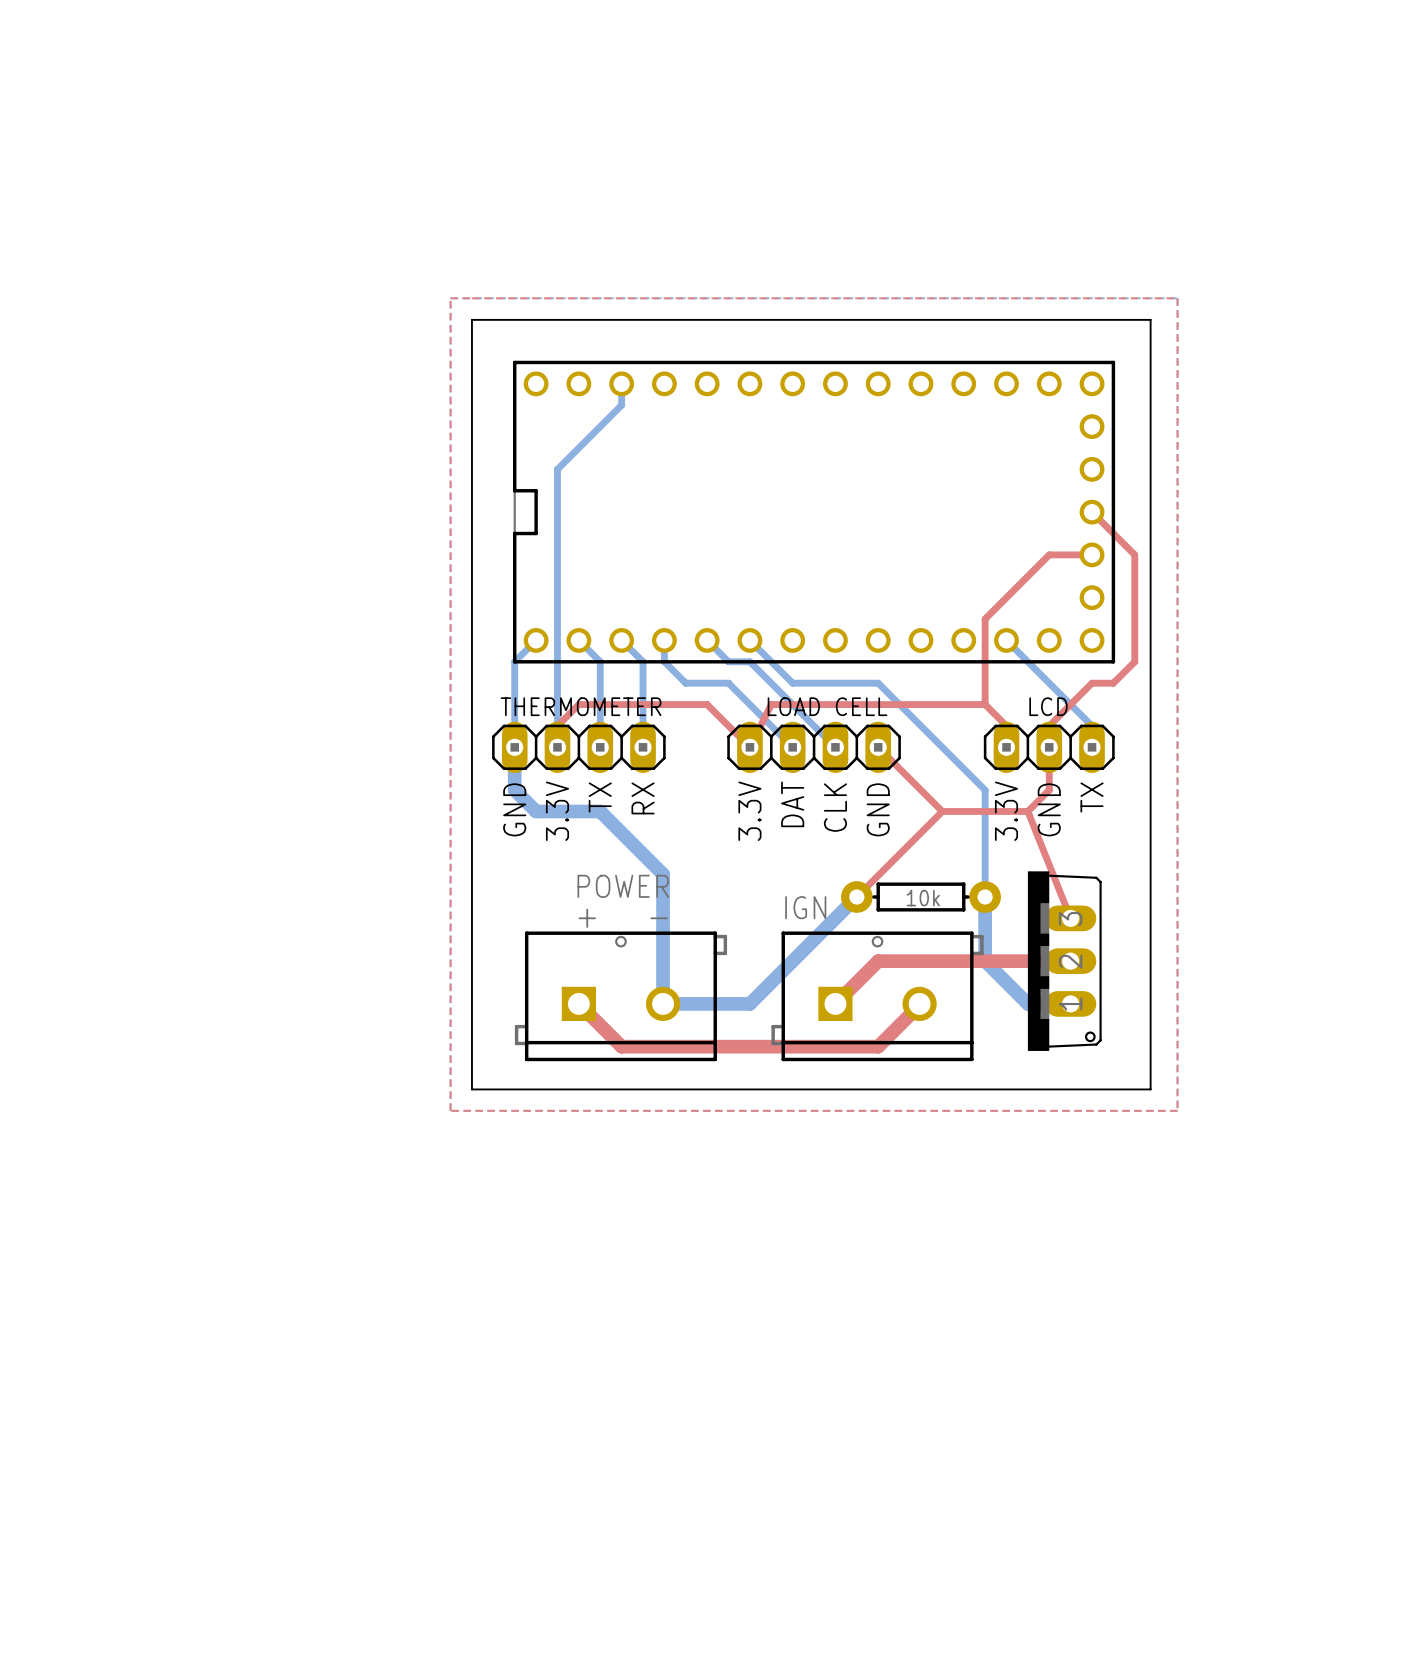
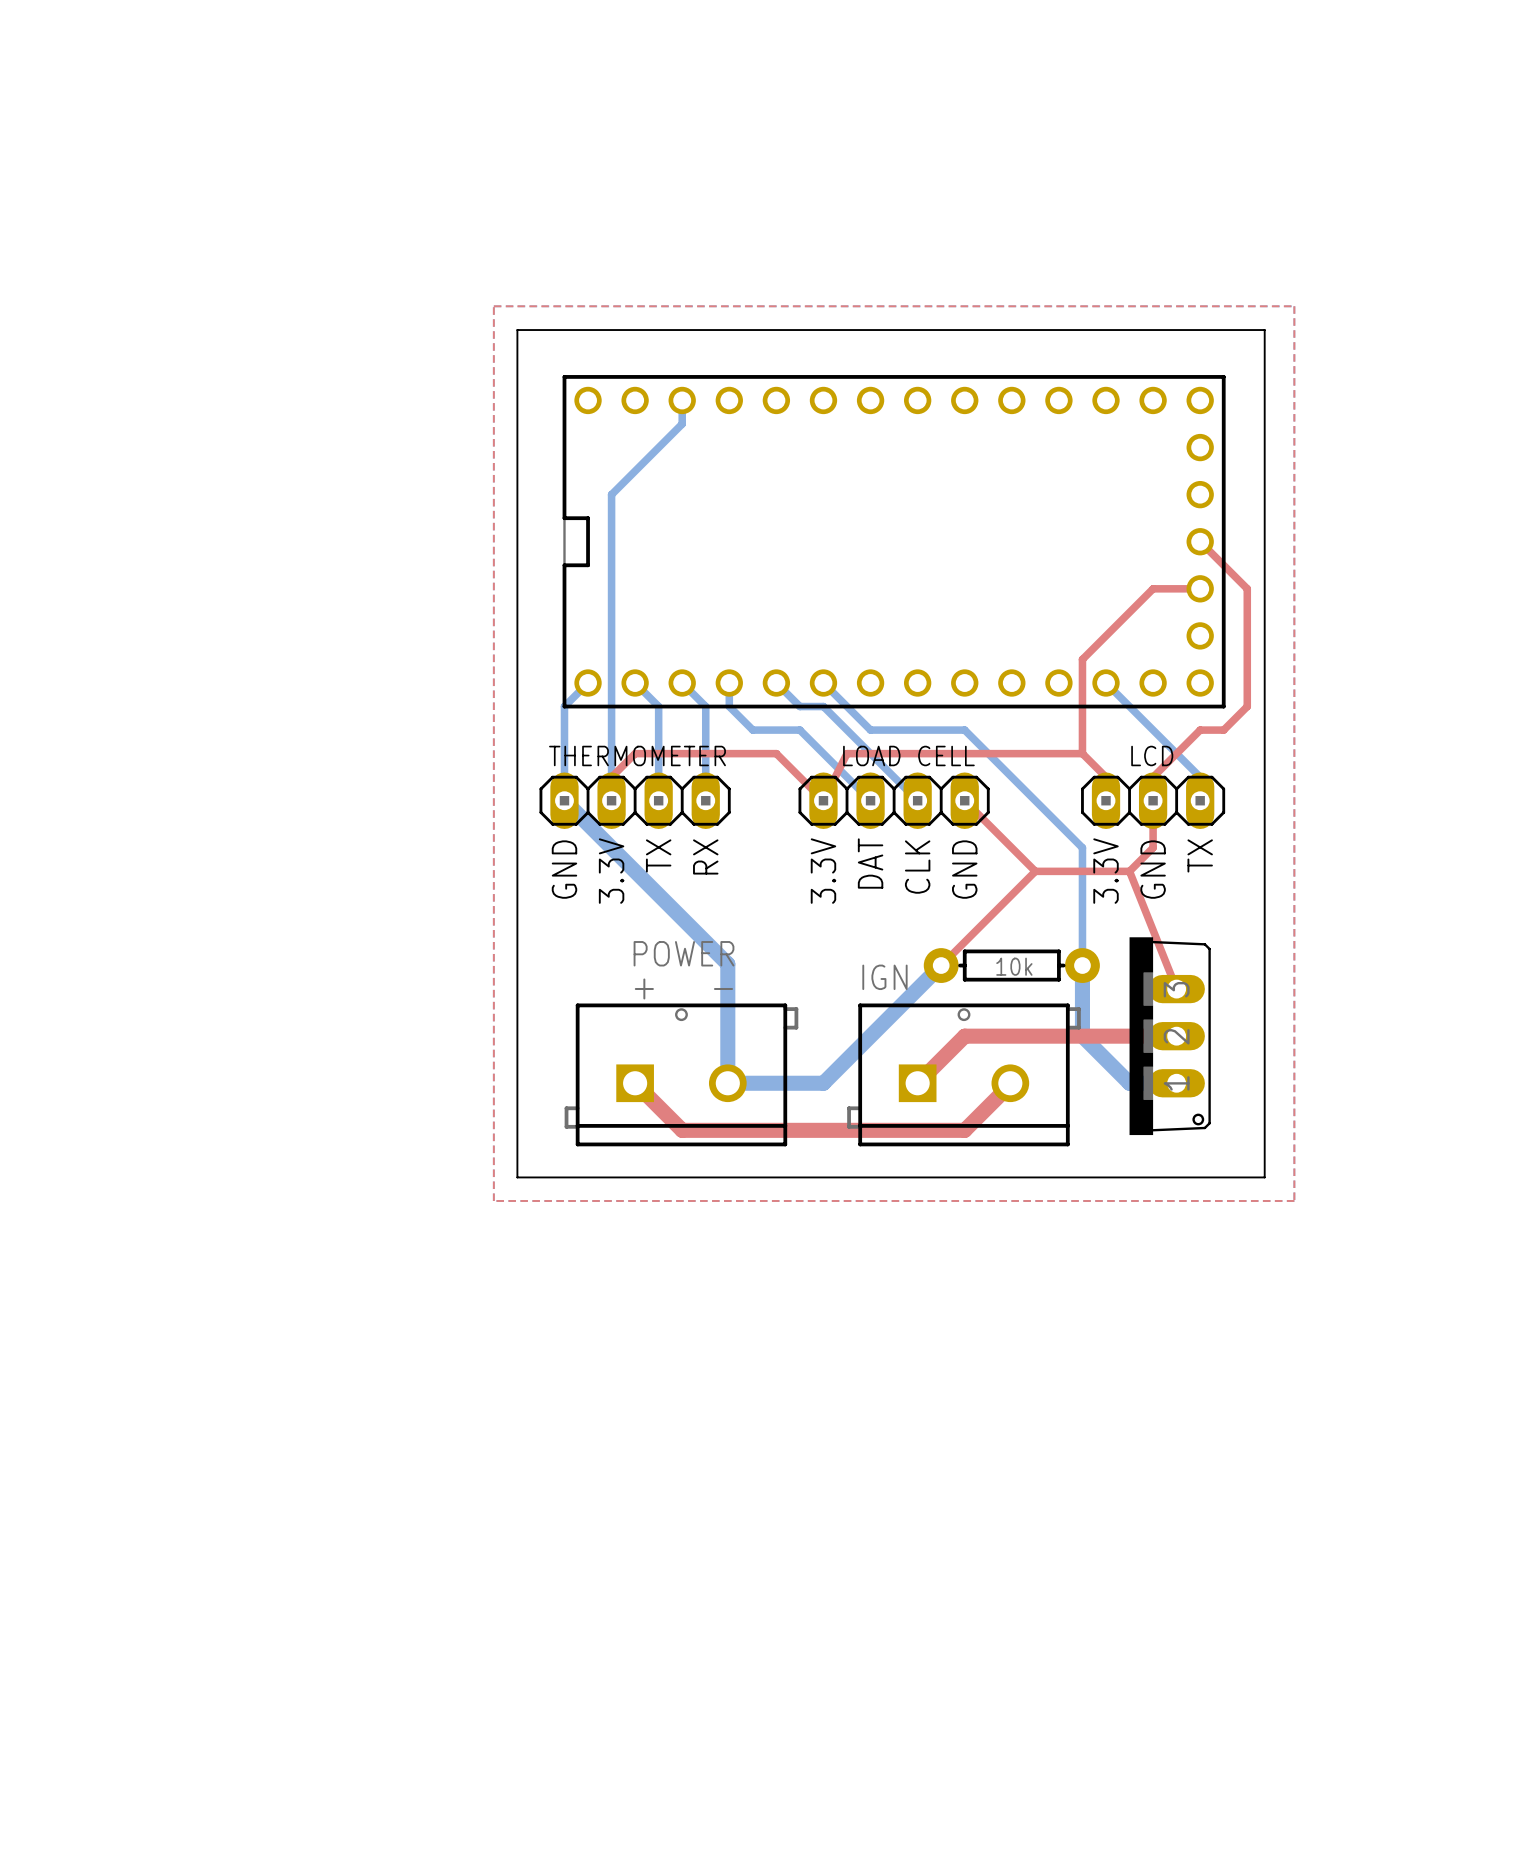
bottom track: (514, 747) (514, 790) (536, 811) (600, 811) (663, 874) (663, 895) -> (564, 800) (727, 964)

